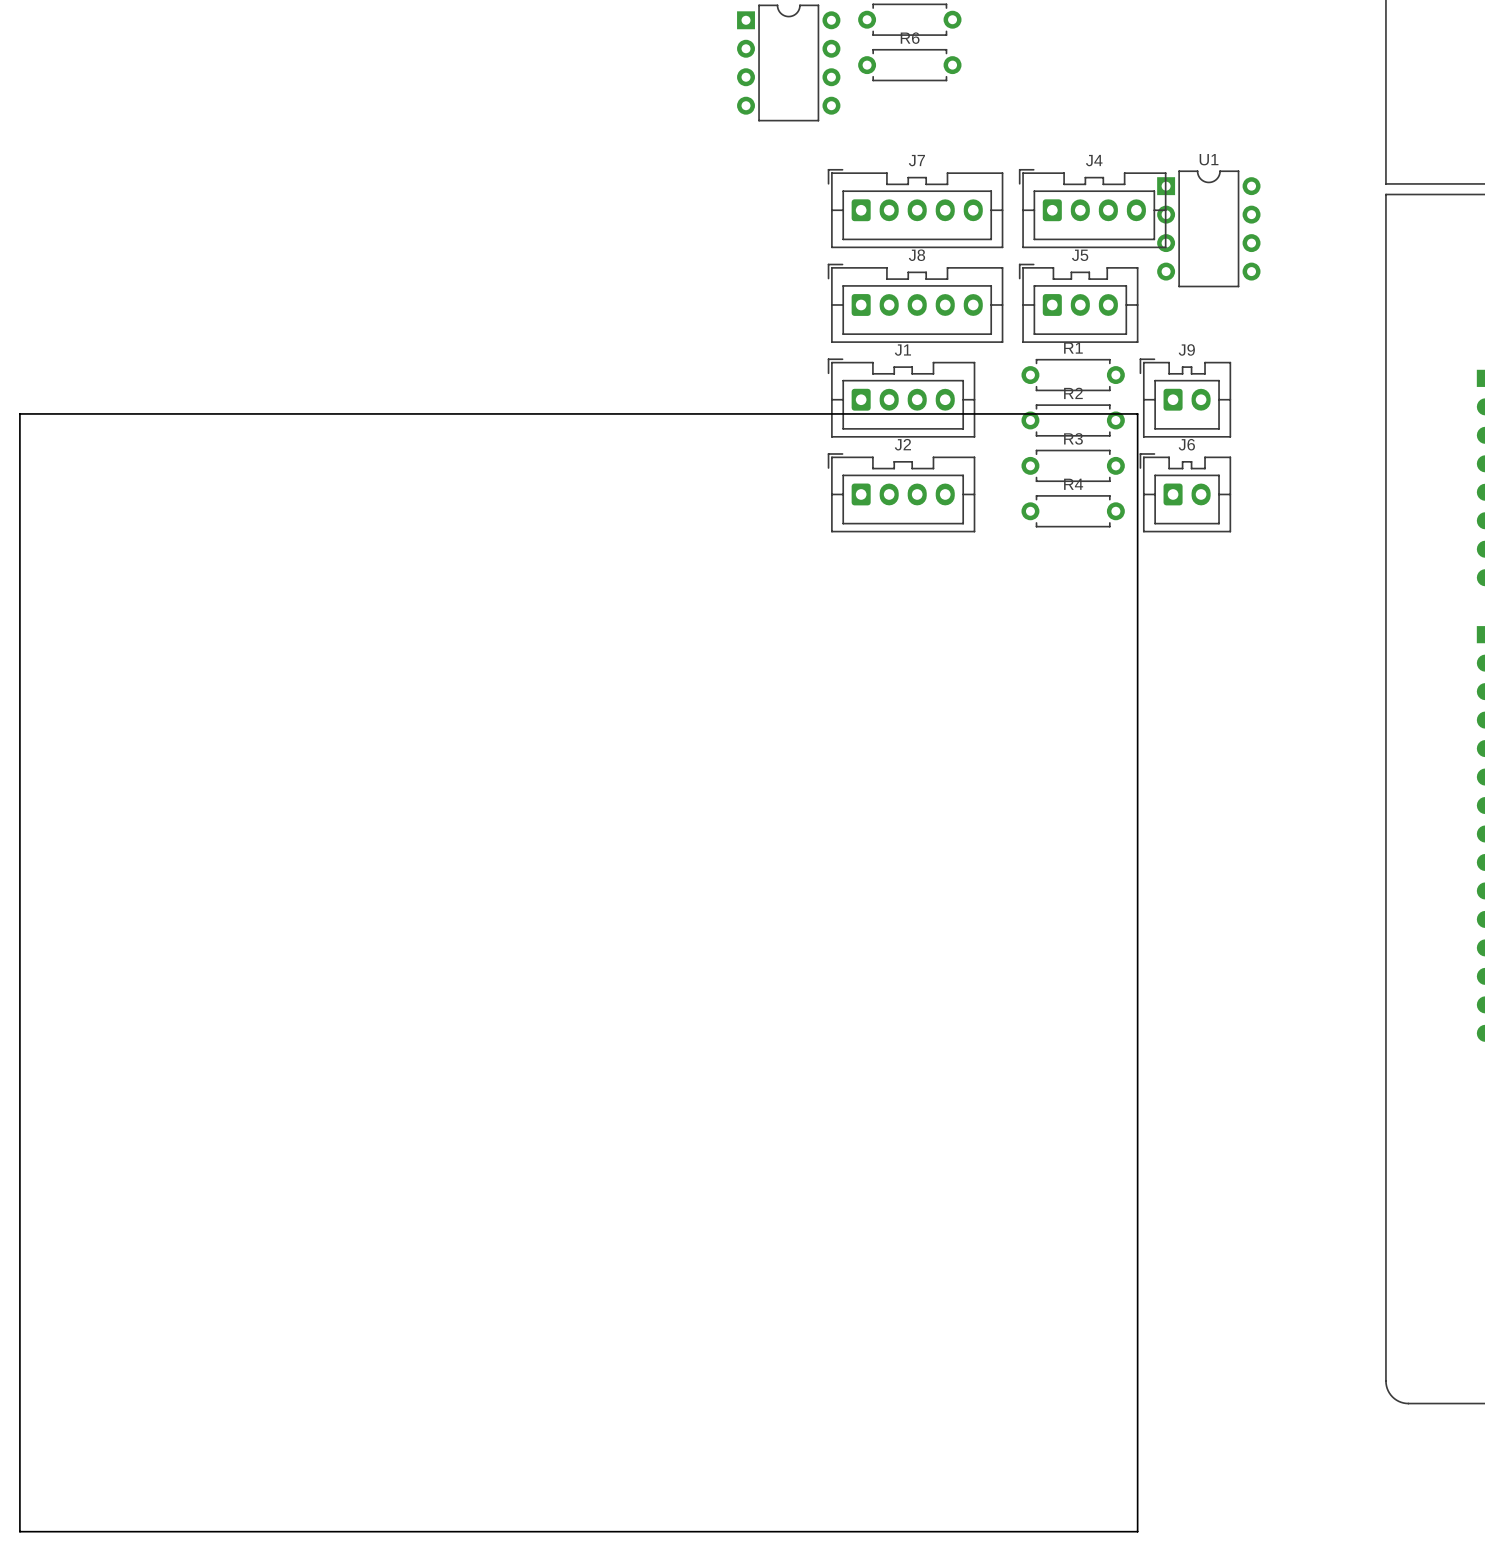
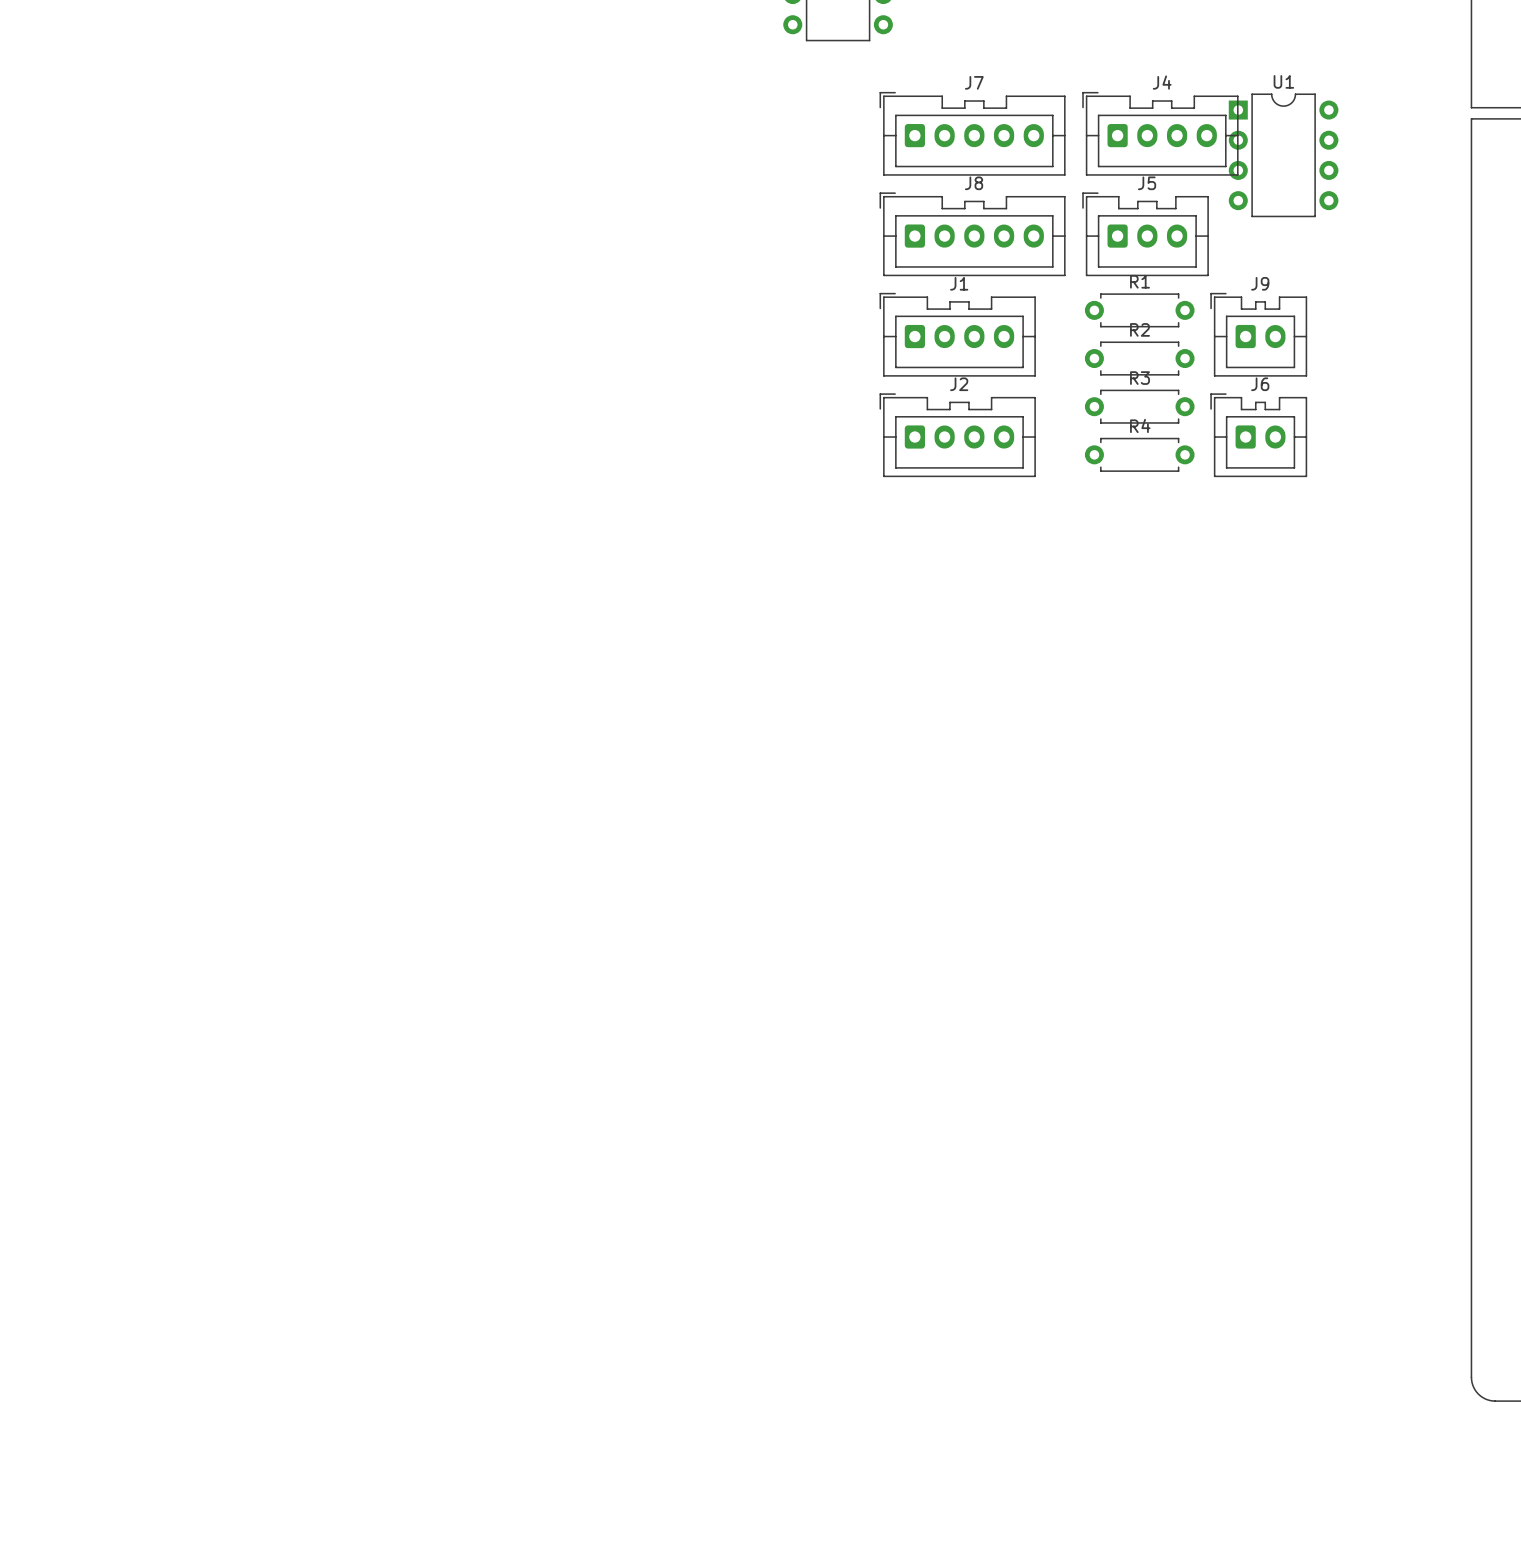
board edge: (19, 413) (1137, 413) (1137, 1531) (19, 1531) (19, 413) -> none

